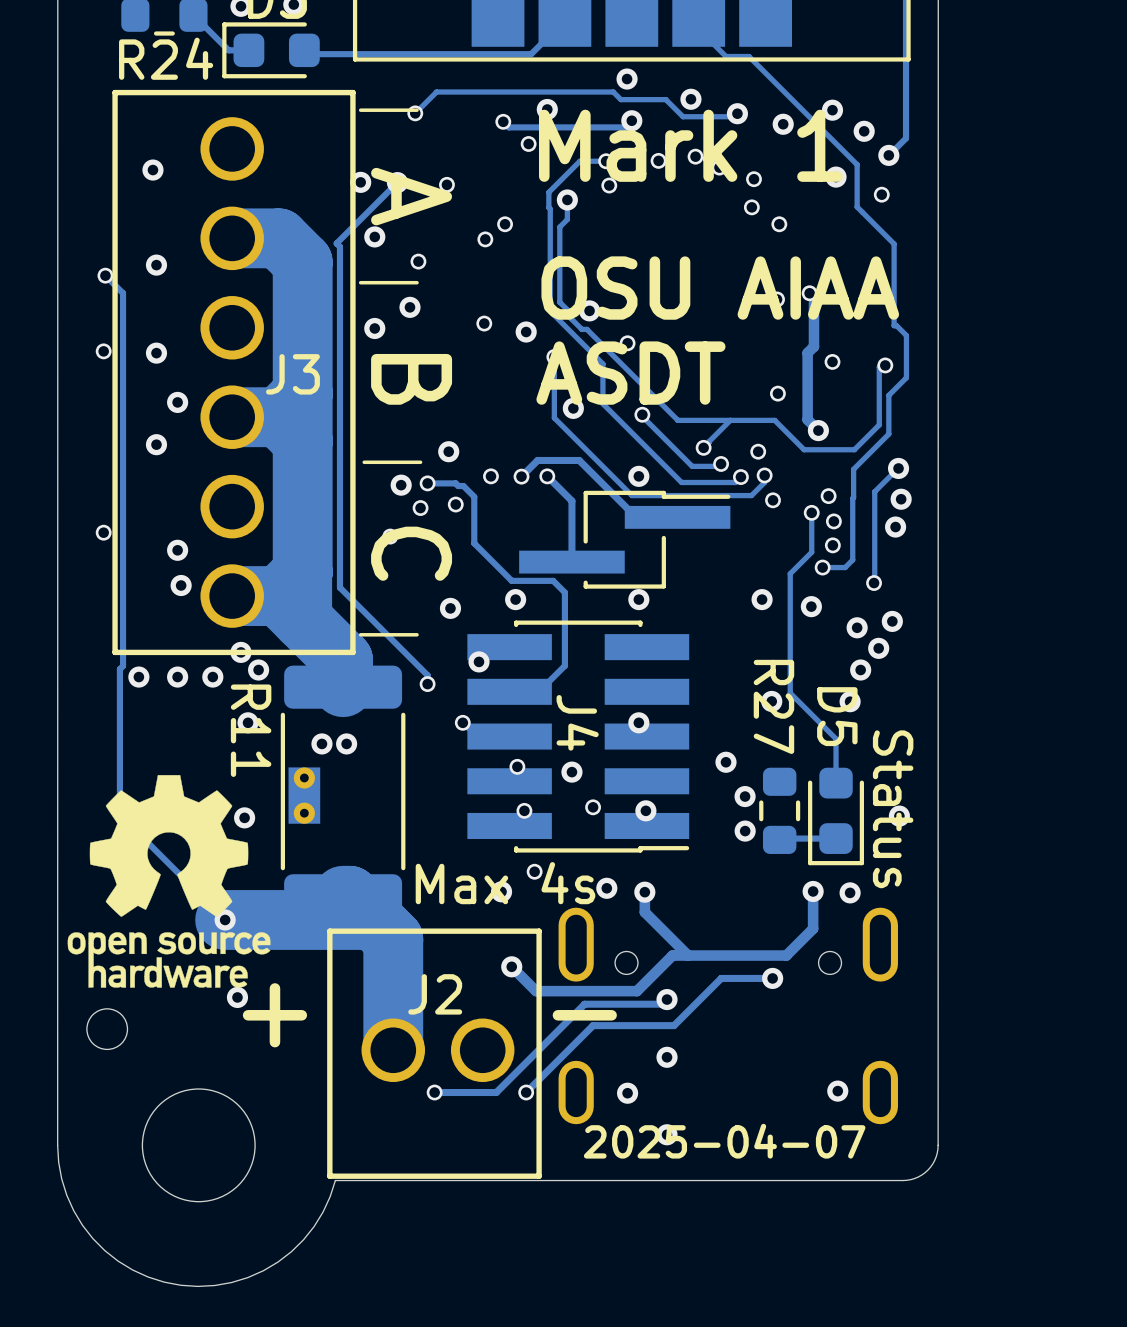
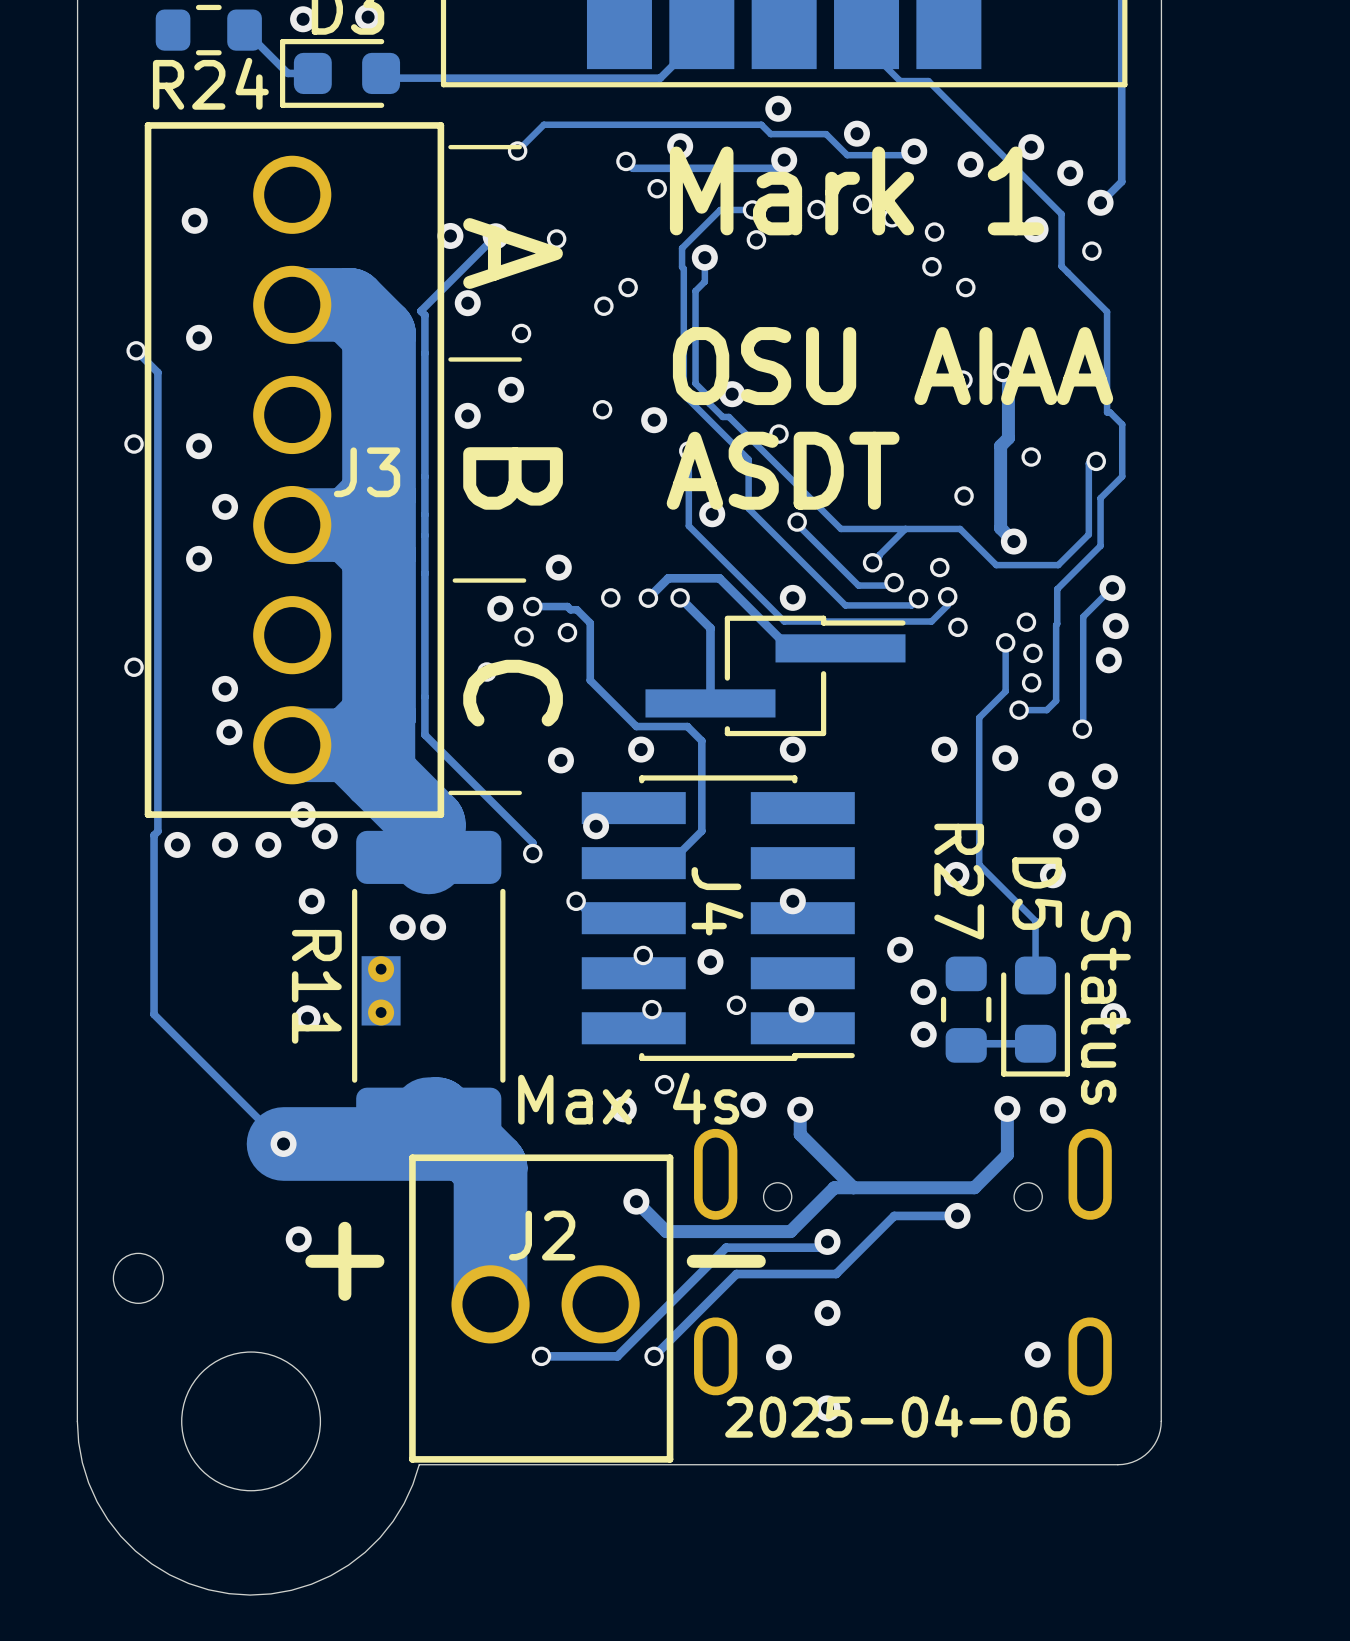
R11 name position: R11 (251, 730) -> R11 (316, 986)
drawing: [67, 775, 271, 988] -> none
text: 2025-04-07 (724, 1141) -> 2025-04-06 (897, 1416)

